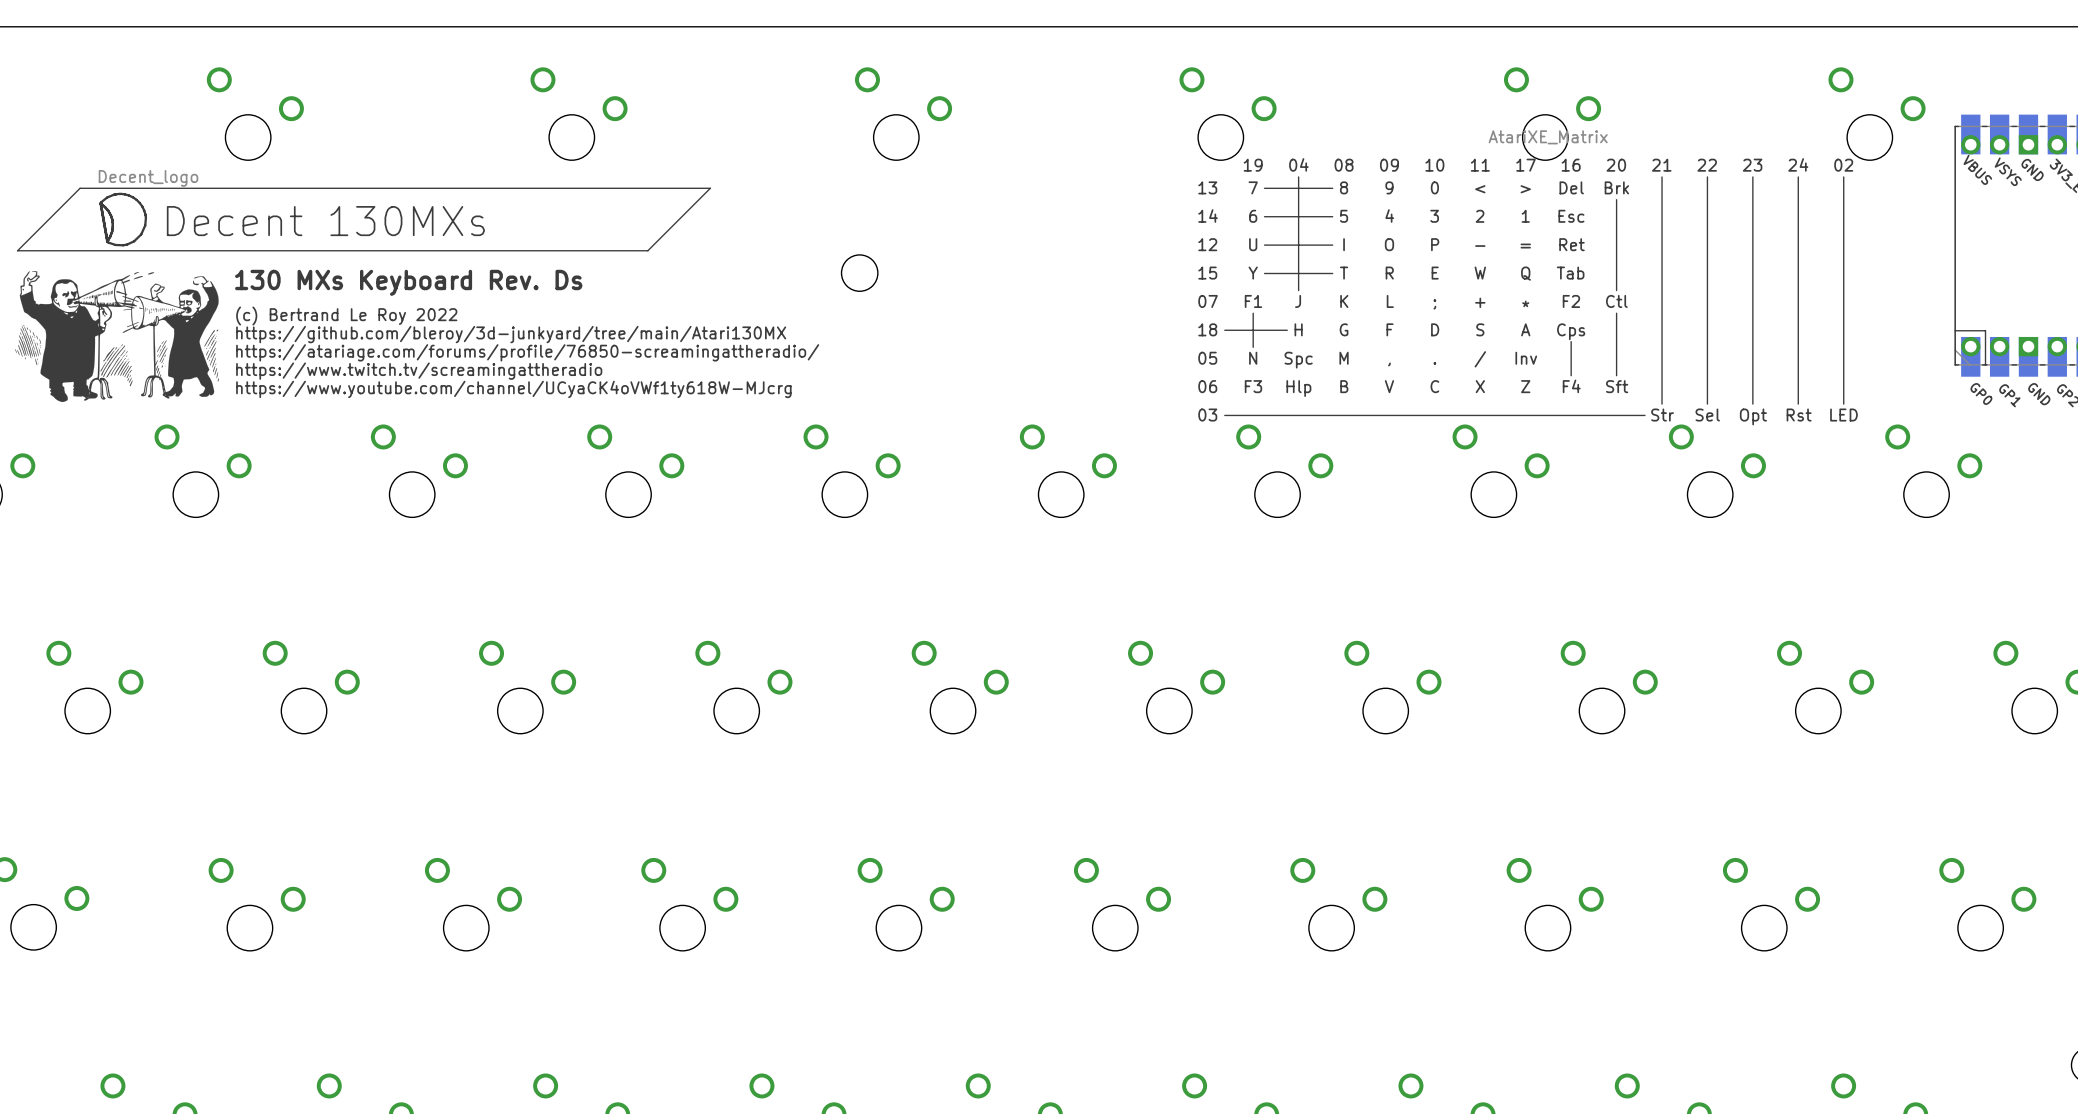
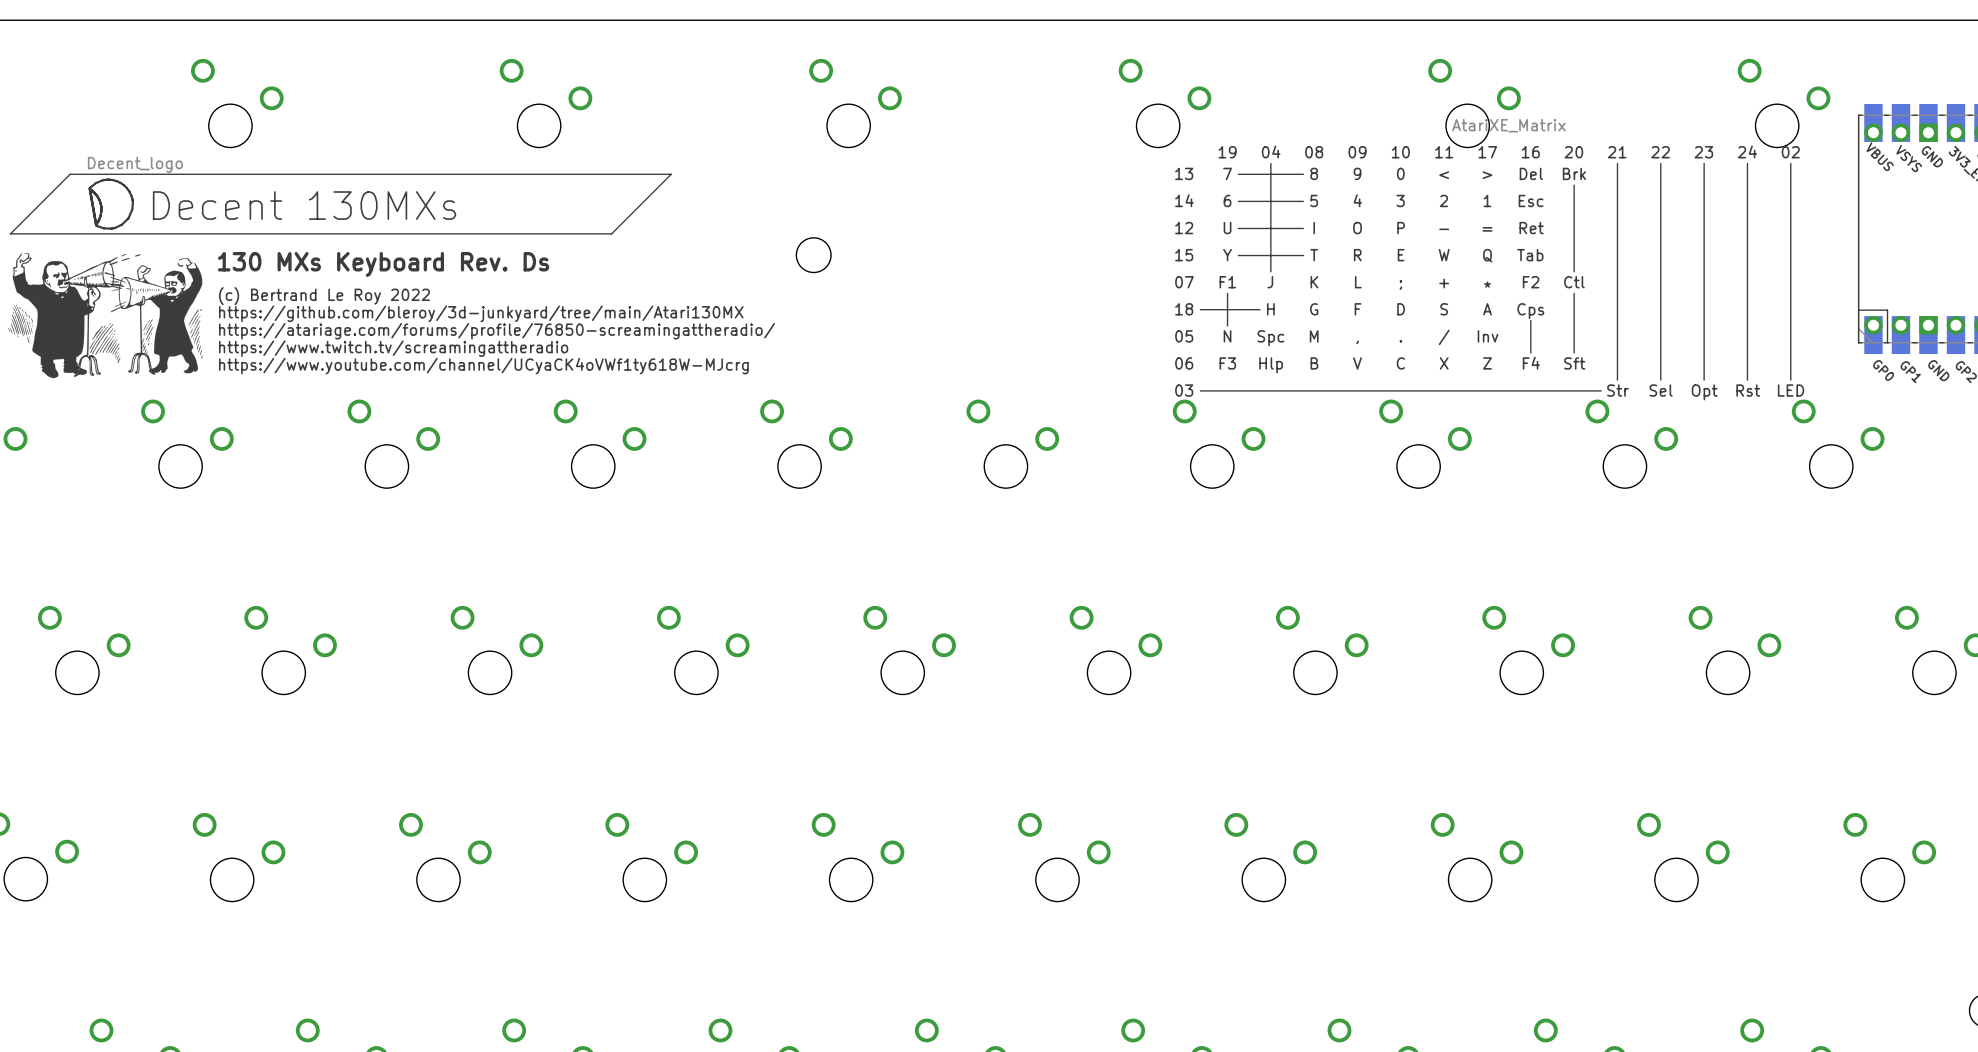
drawing position: (1534, 296) -> (1495, 277)

